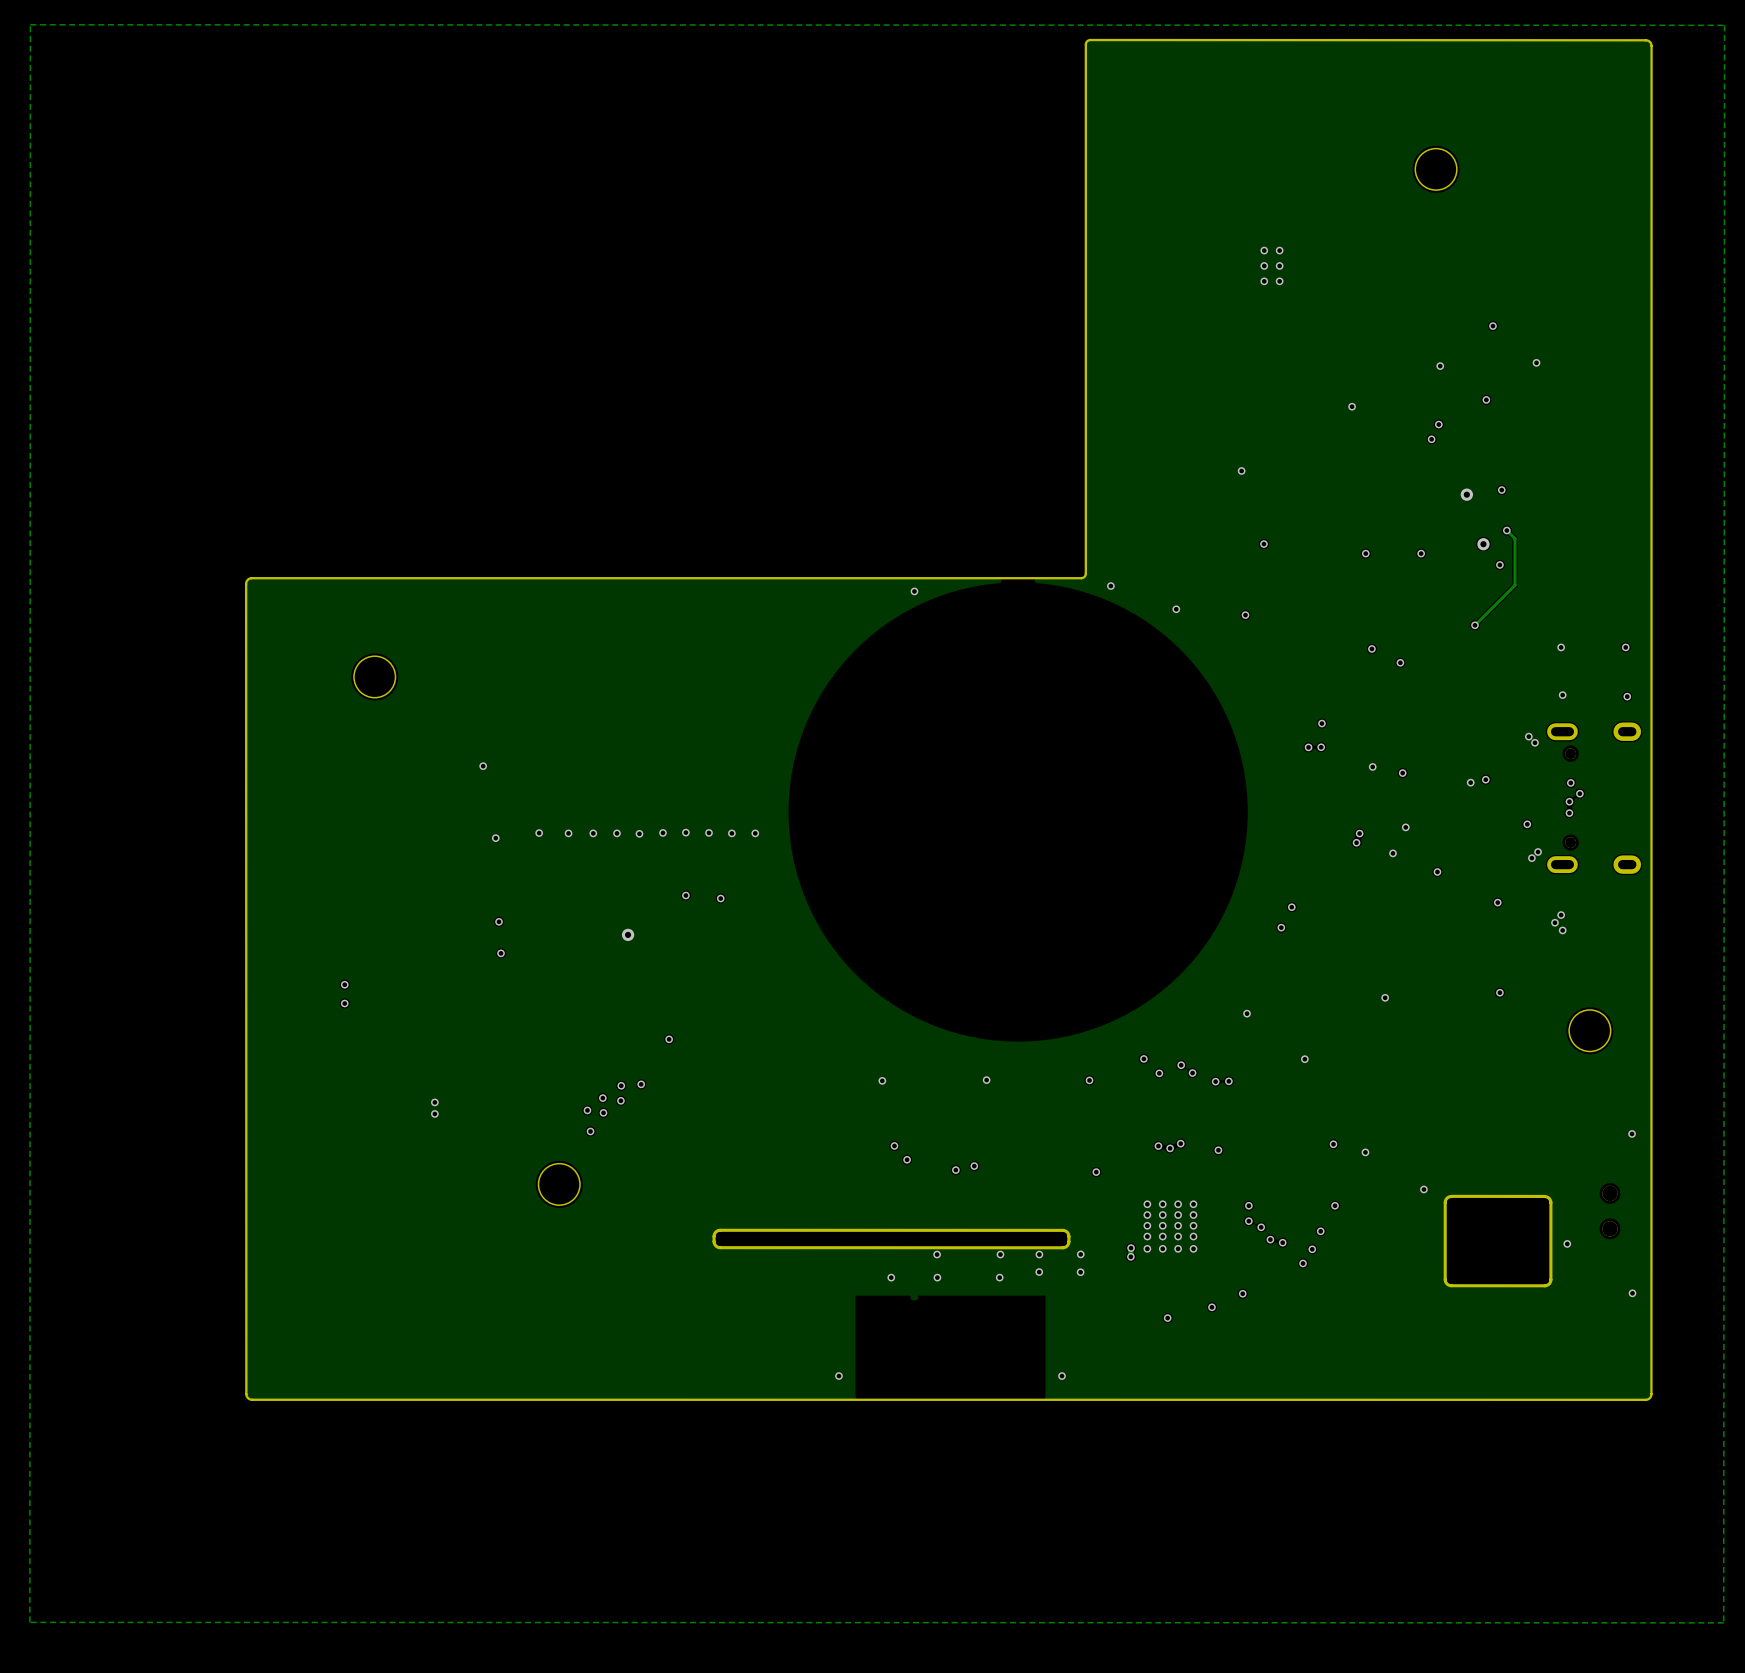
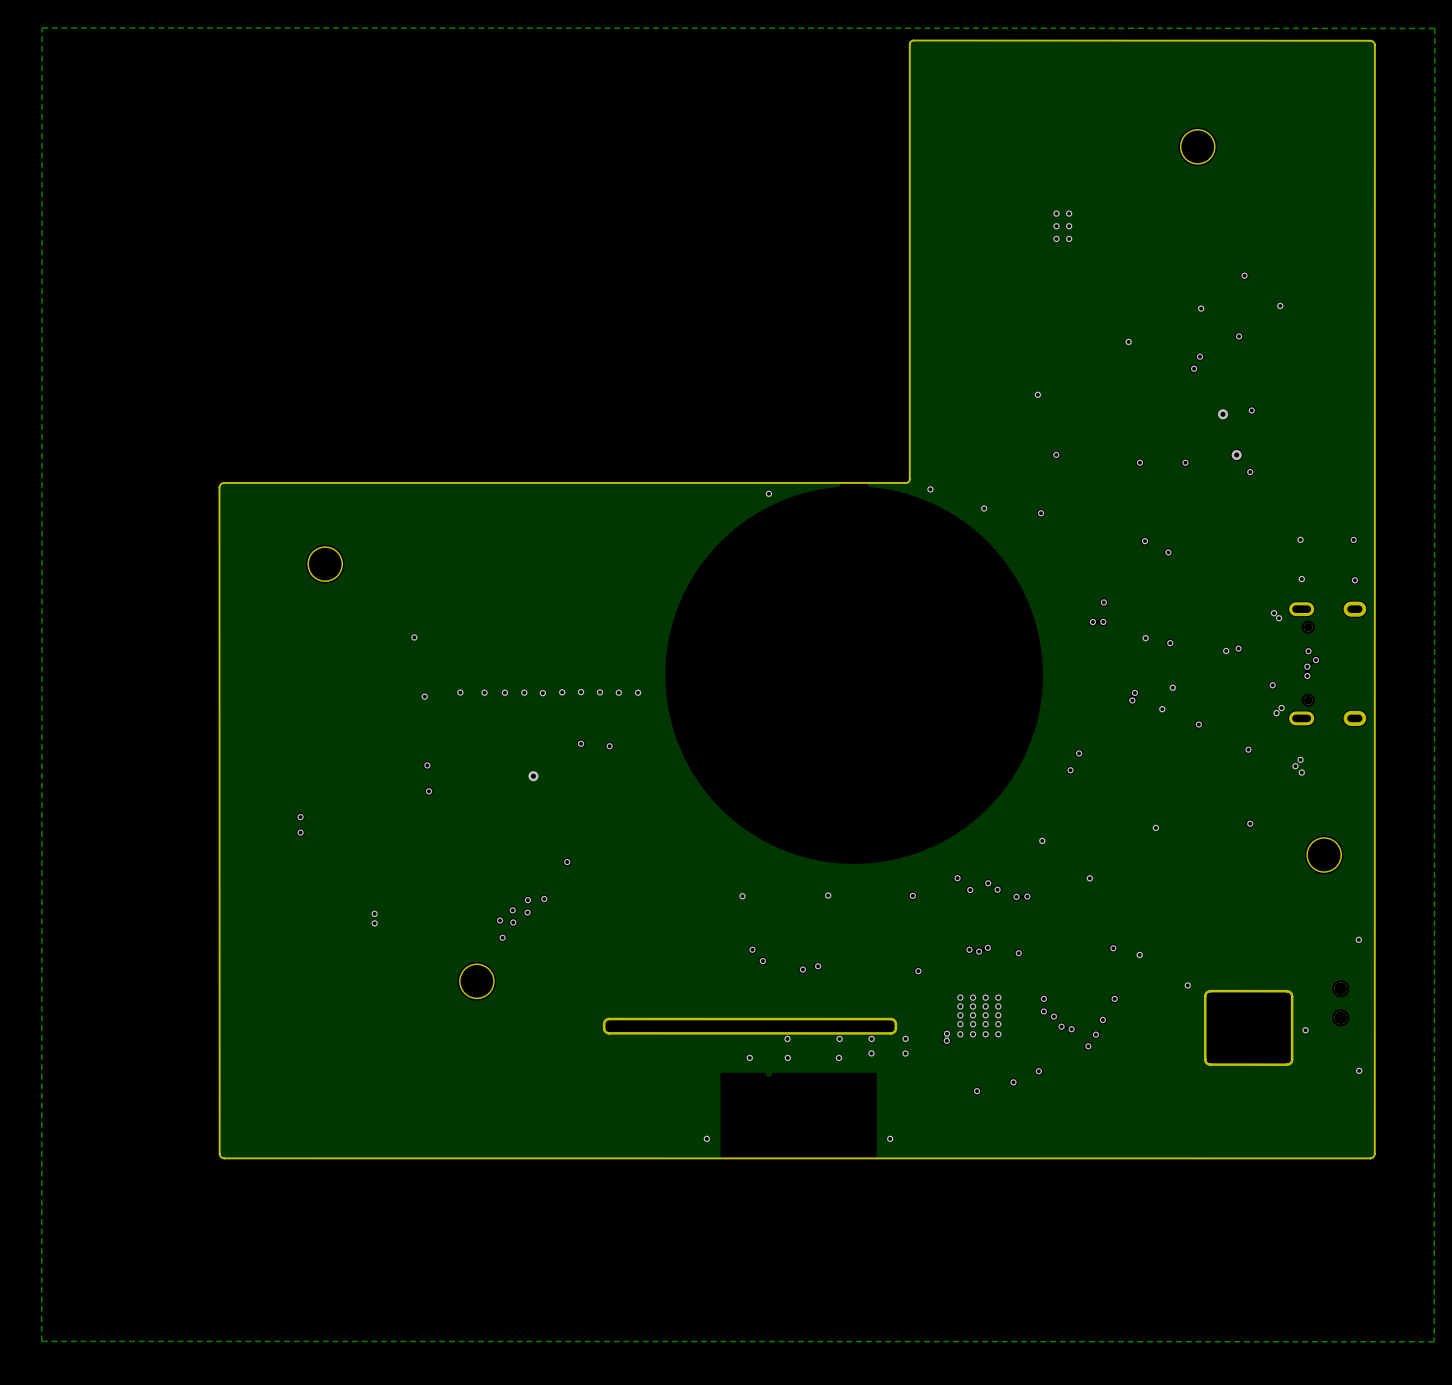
track: (1506, 530) (1514, 538) (1514, 585) (1474, 625) -> none
via: (1506, 530) -> none
via: (1474, 625) -> none

